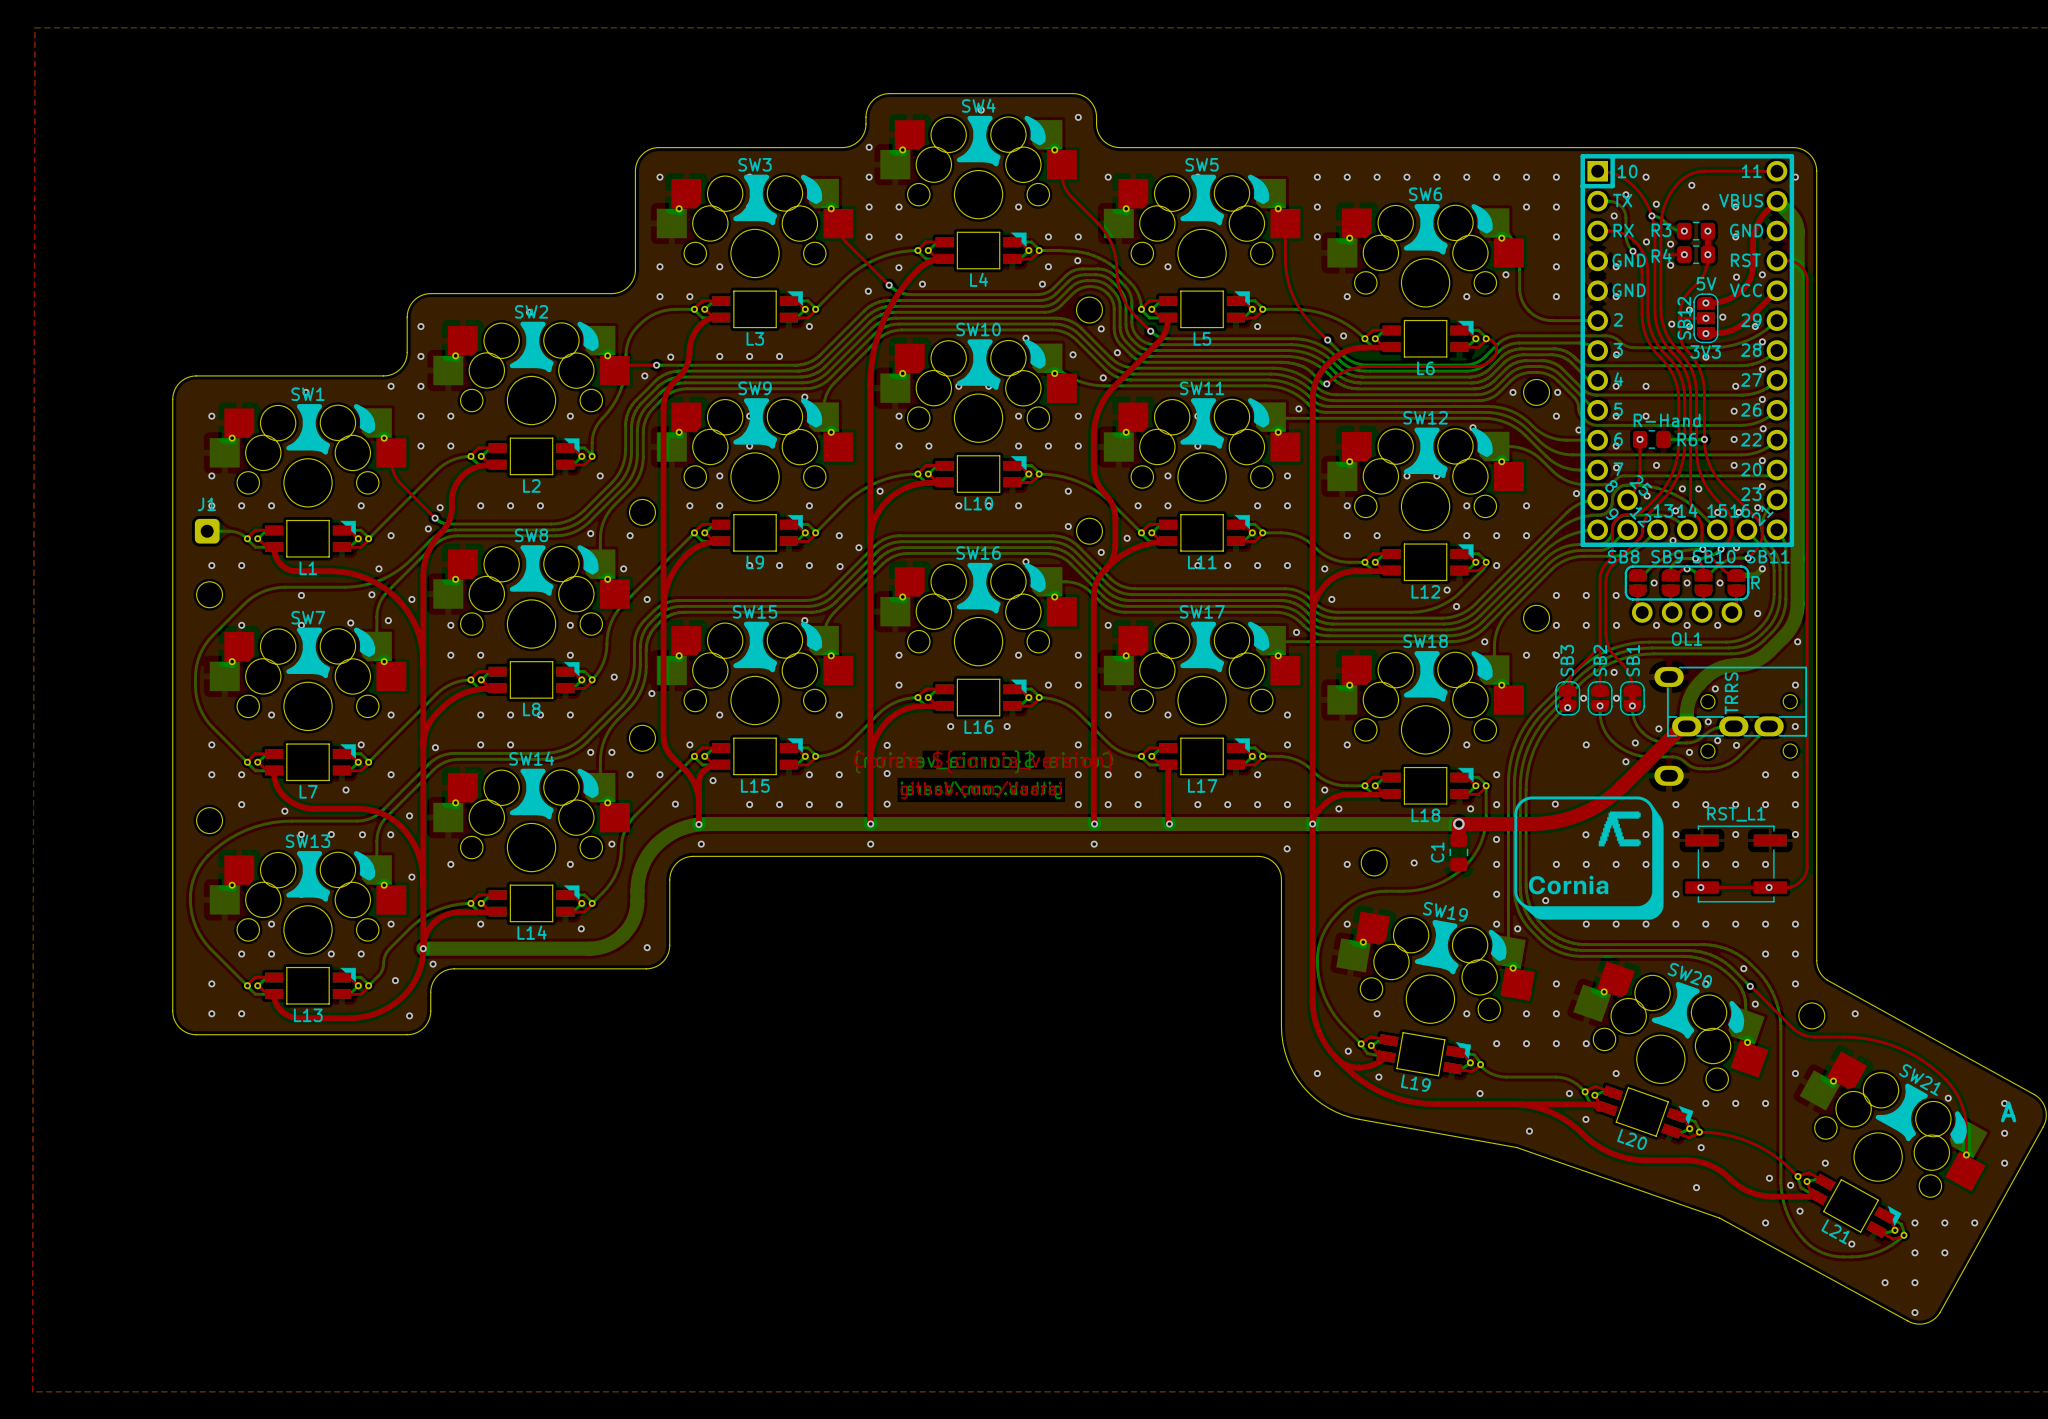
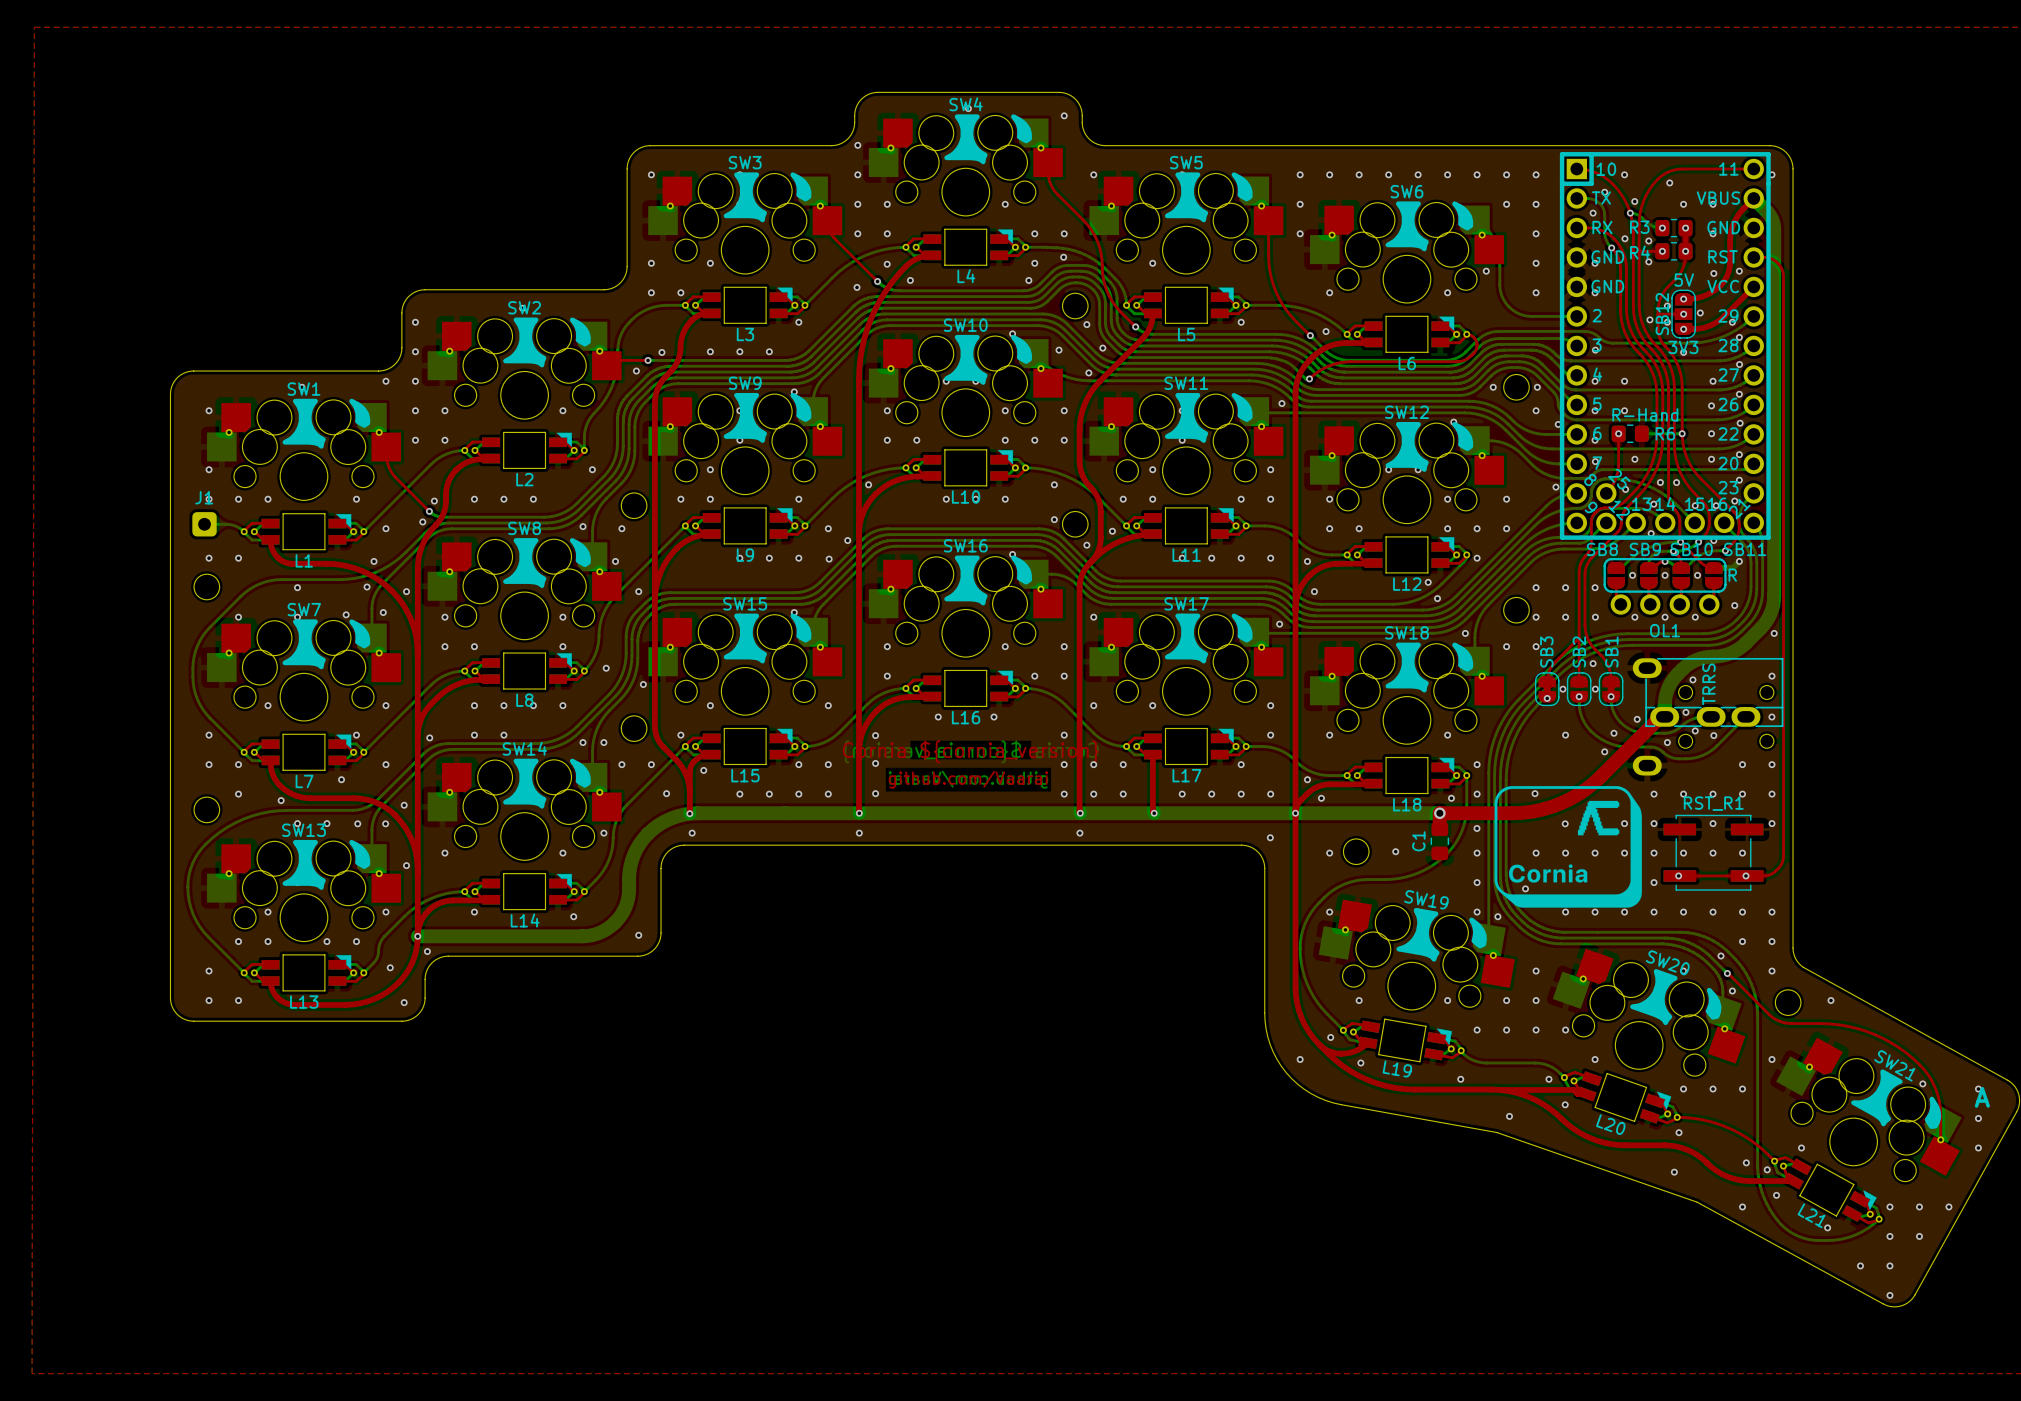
RST_L1 name: RST_L1 (1736, 814) -> RST_R1 (1713, 803)

